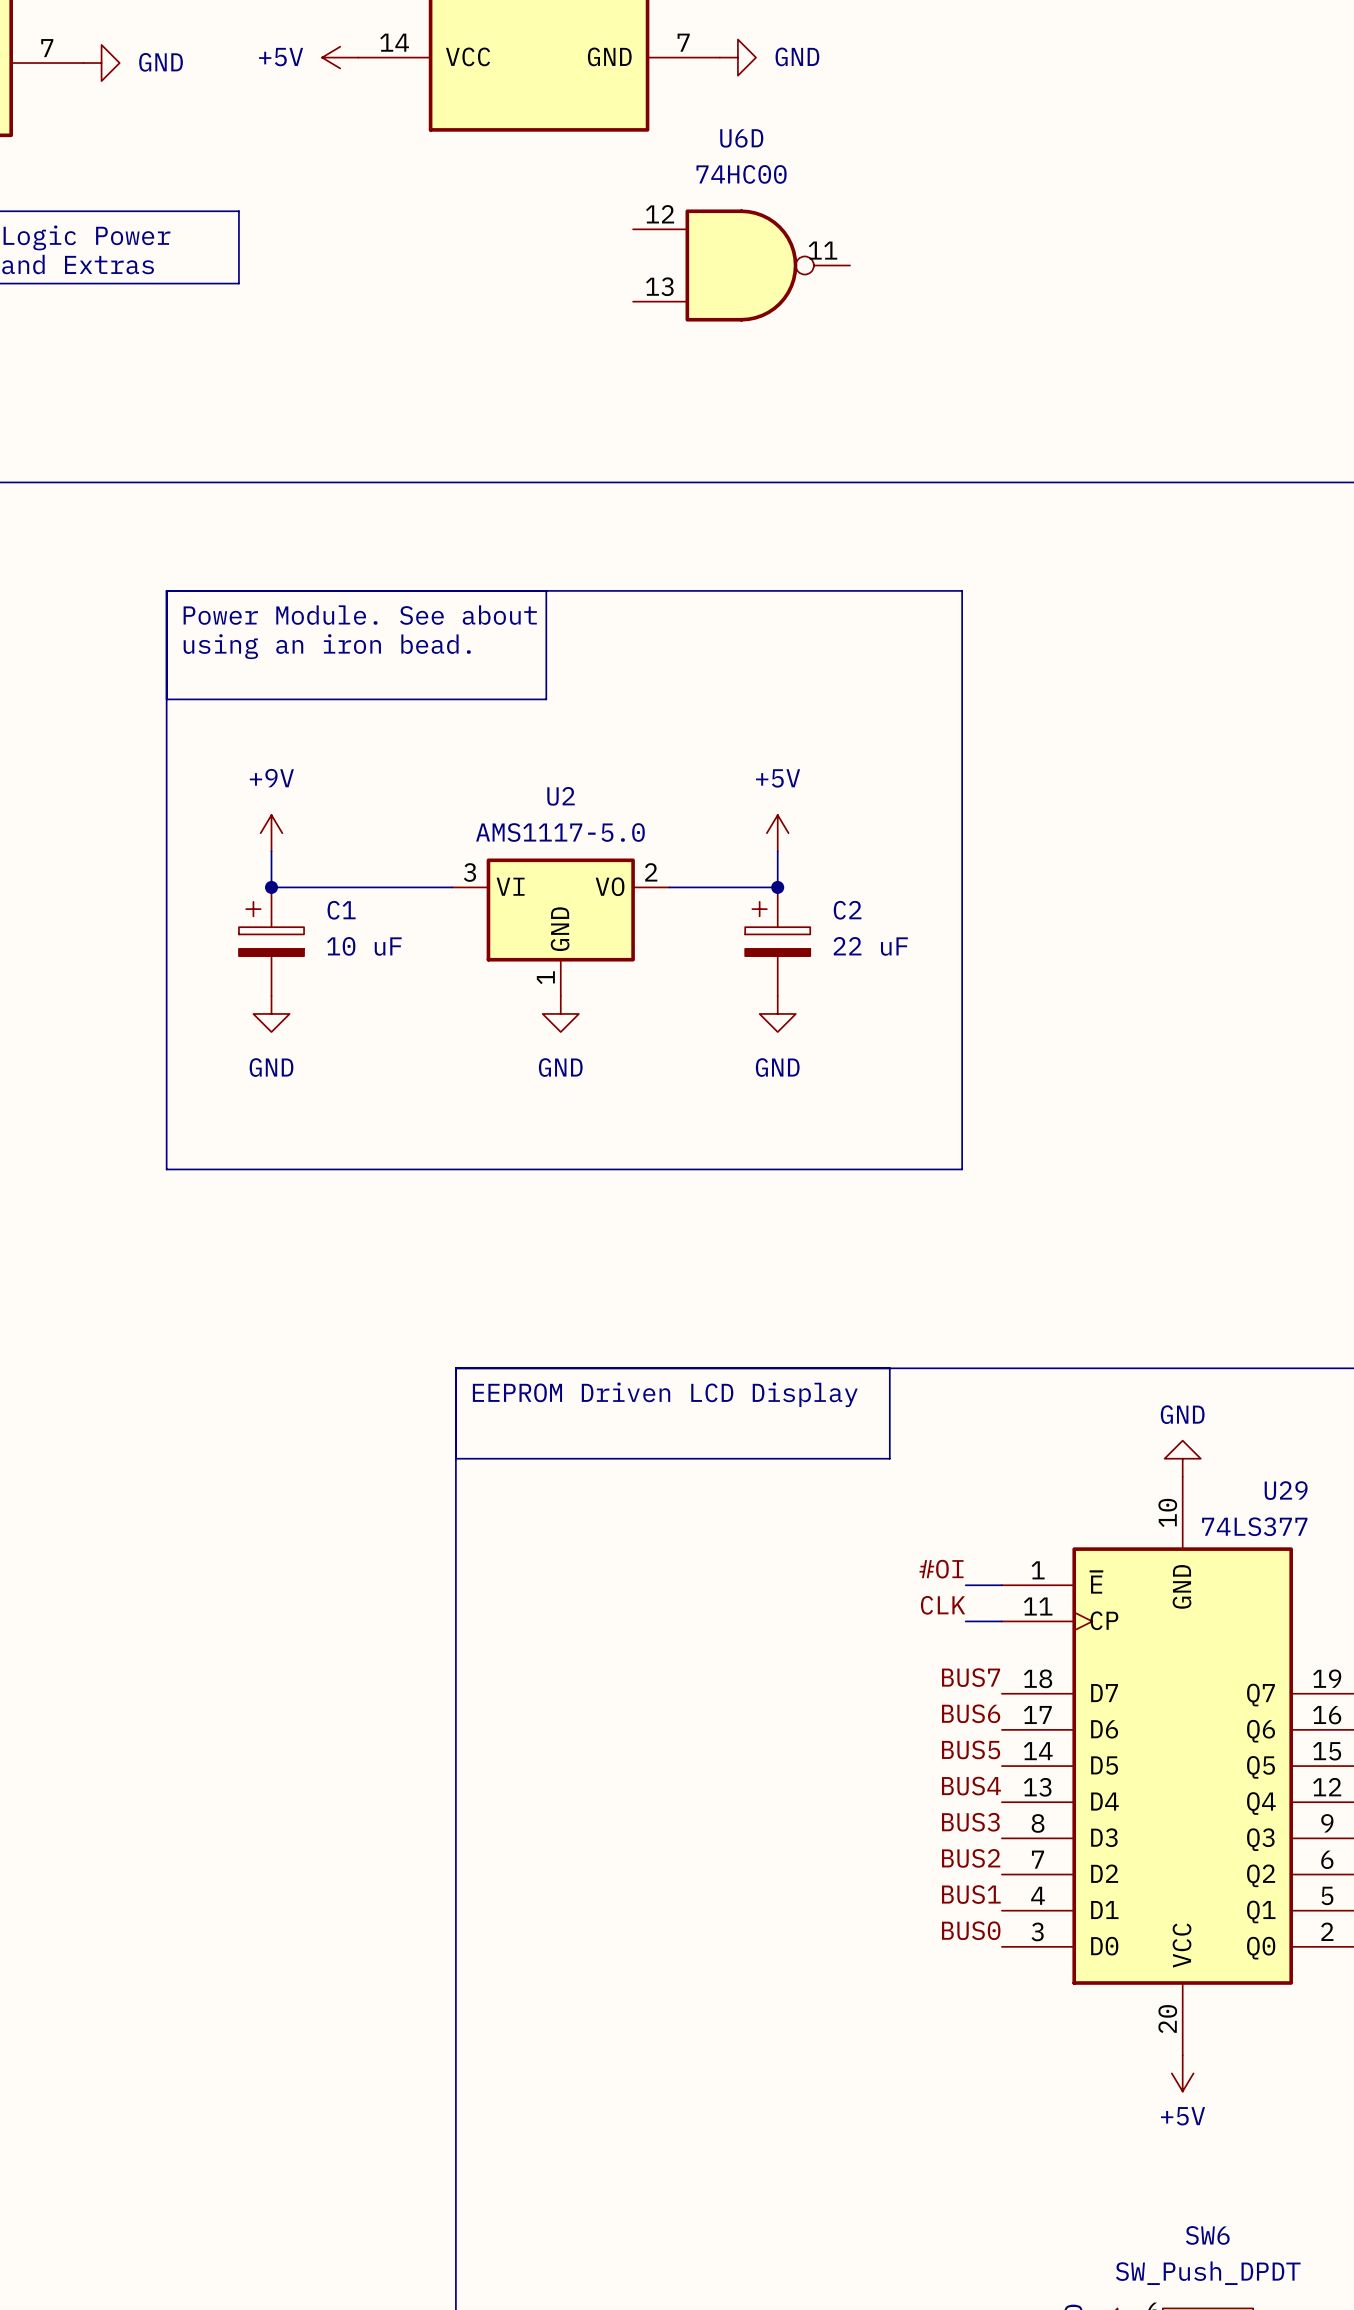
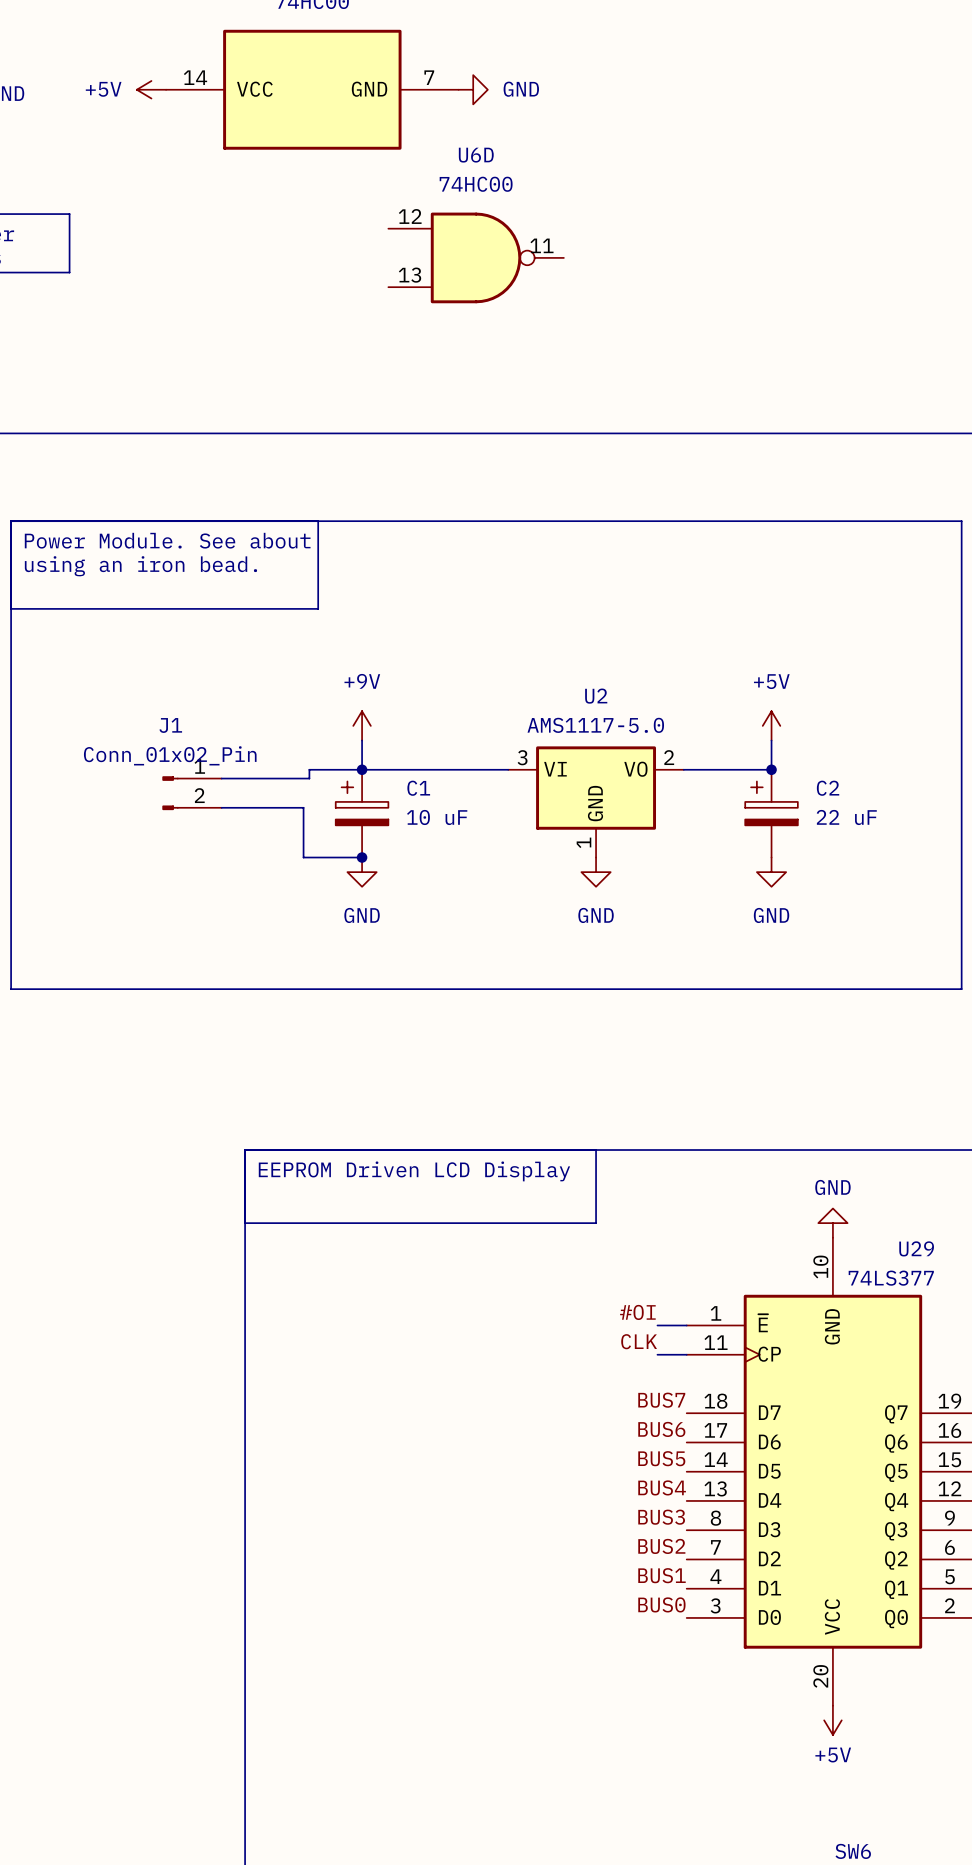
line: (962, 590) (962, 1169) -> (654, 521) (961, 521) (961, 989) (654, 989)
power symbol position: +9V (271, 833) -> +9V (362, 725)
power symbol position: +5V (777, 833) -> +5V (771, 725)
wire: (271, 851) (271, 887) (452, 887) -> none
wire: (777, 851) (777, 887) (669, 887) -> (771, 740) (771, 769) (683, 769)
junction: (271, 887) -> none
junction: (777, 887) -> none
junction: none -> (362, 769)
wire: none -> (508, 769) (309, 769) (309, 778) (221, 778)
junction: none -> (771, 769)
J1: none -> Conn_01x02_Pin (191, 793)
U2 position: (560, 927) -> (596, 801)
C1 position: (271, 941) -> (362, 813)
C2 position: (777, 941) -> (771, 813)
wire: none -> (221, 807) (303, 807) (303, 857) (362, 857)
junction: none -> (362, 857)
power symbol: GND (271, 1013) -> none
power symbol position: GND (560, 1013) -> GND (362, 872)
power symbol: GND (777, 1013) -> none
power symbol: none -> GND (596, 872)
power symbol: none -> GND (771, 872)

